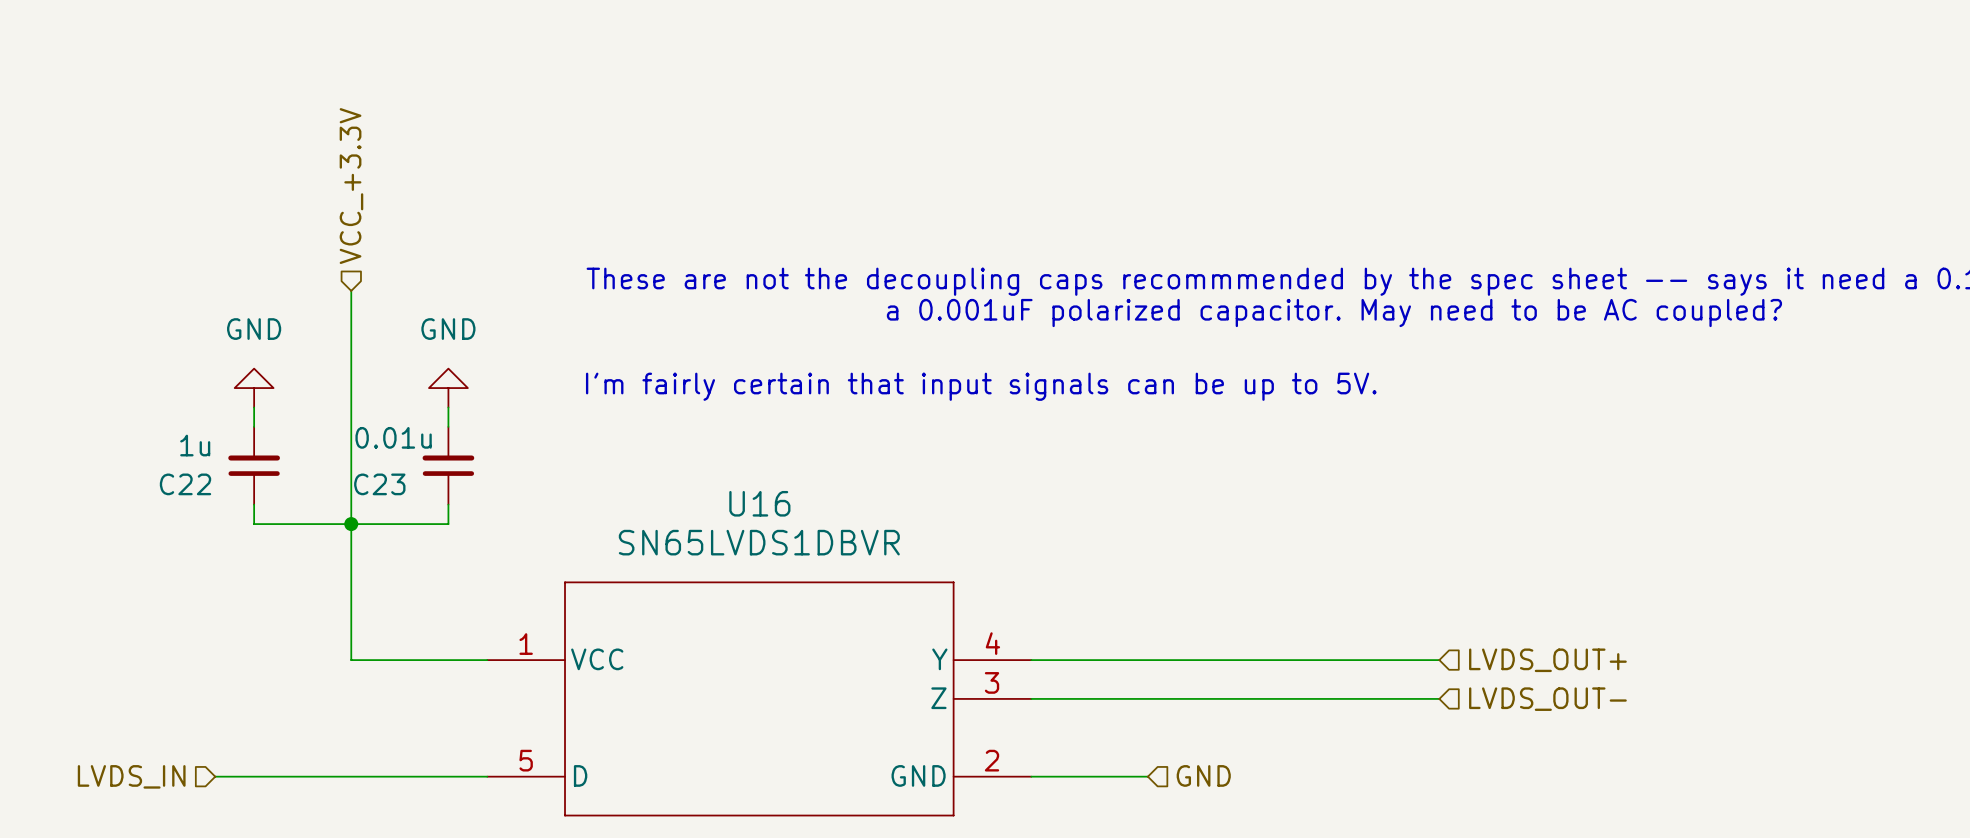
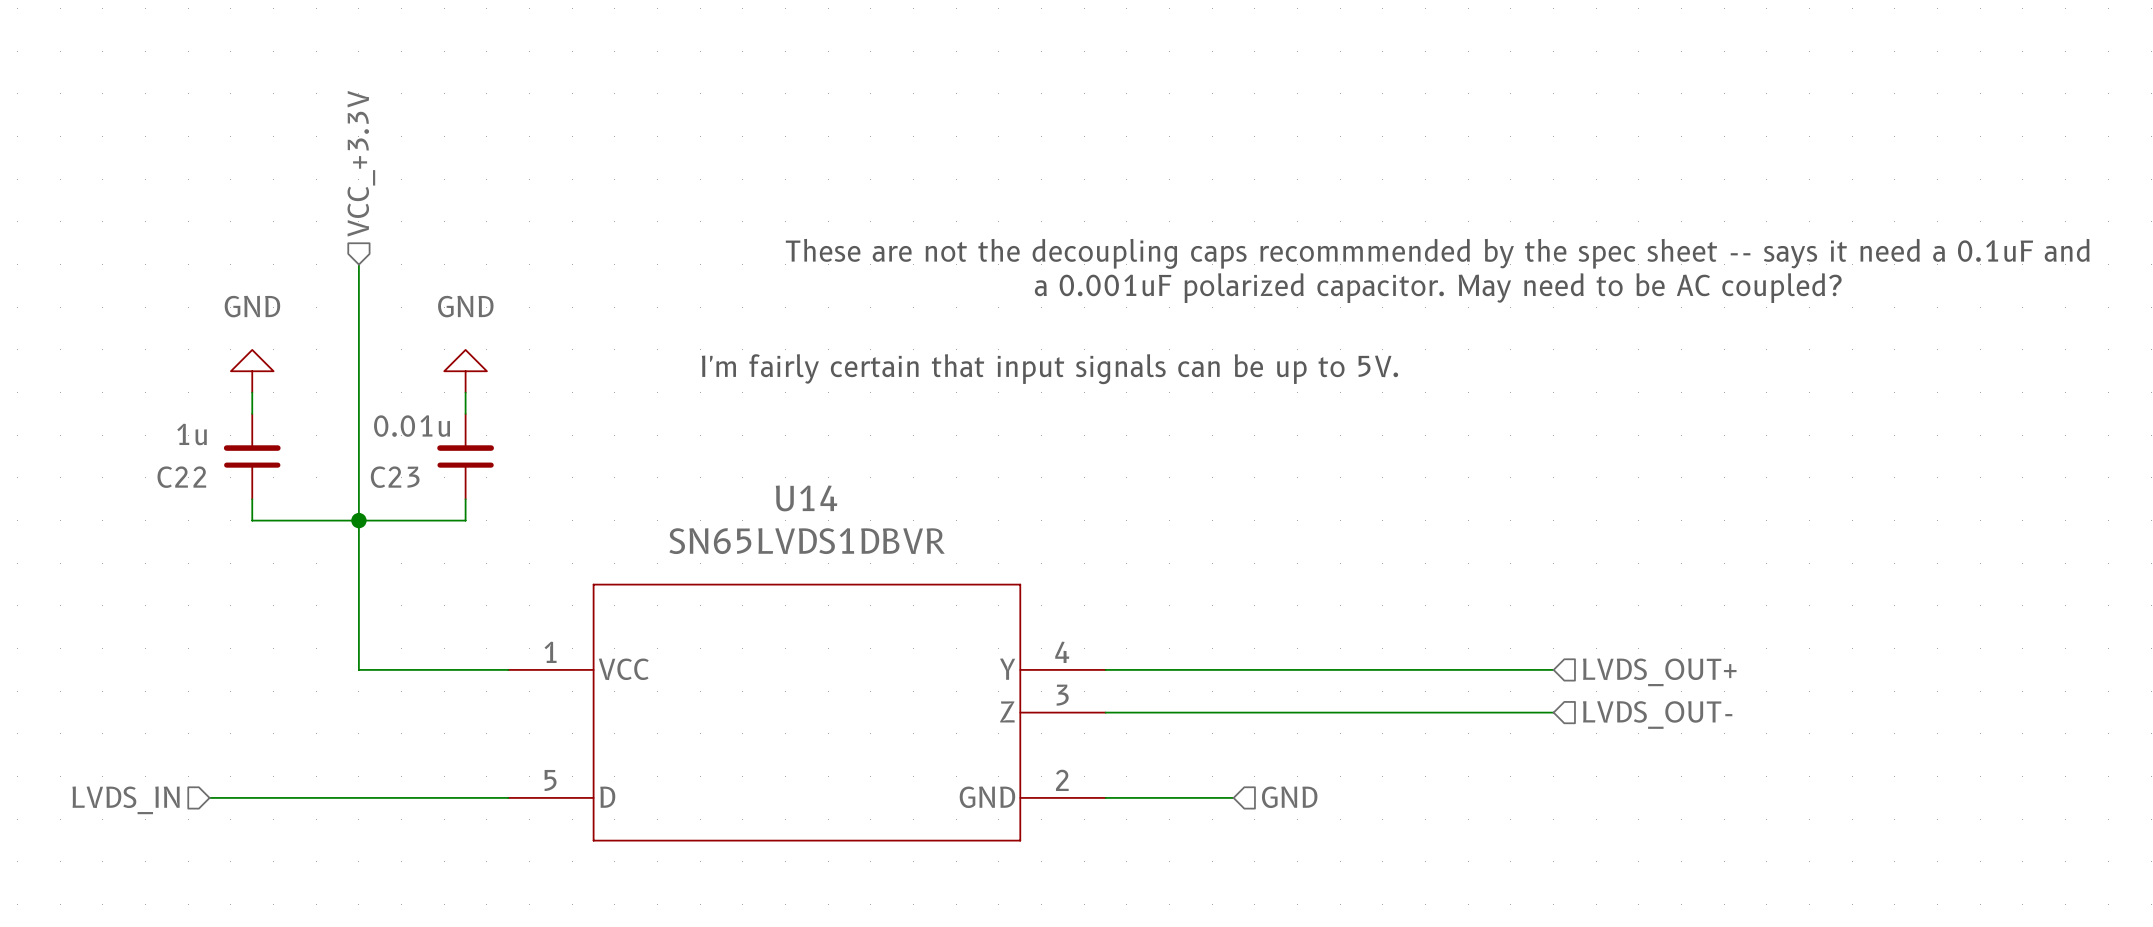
U16 name: U16 (759, 503) -> U14 (806, 498)

